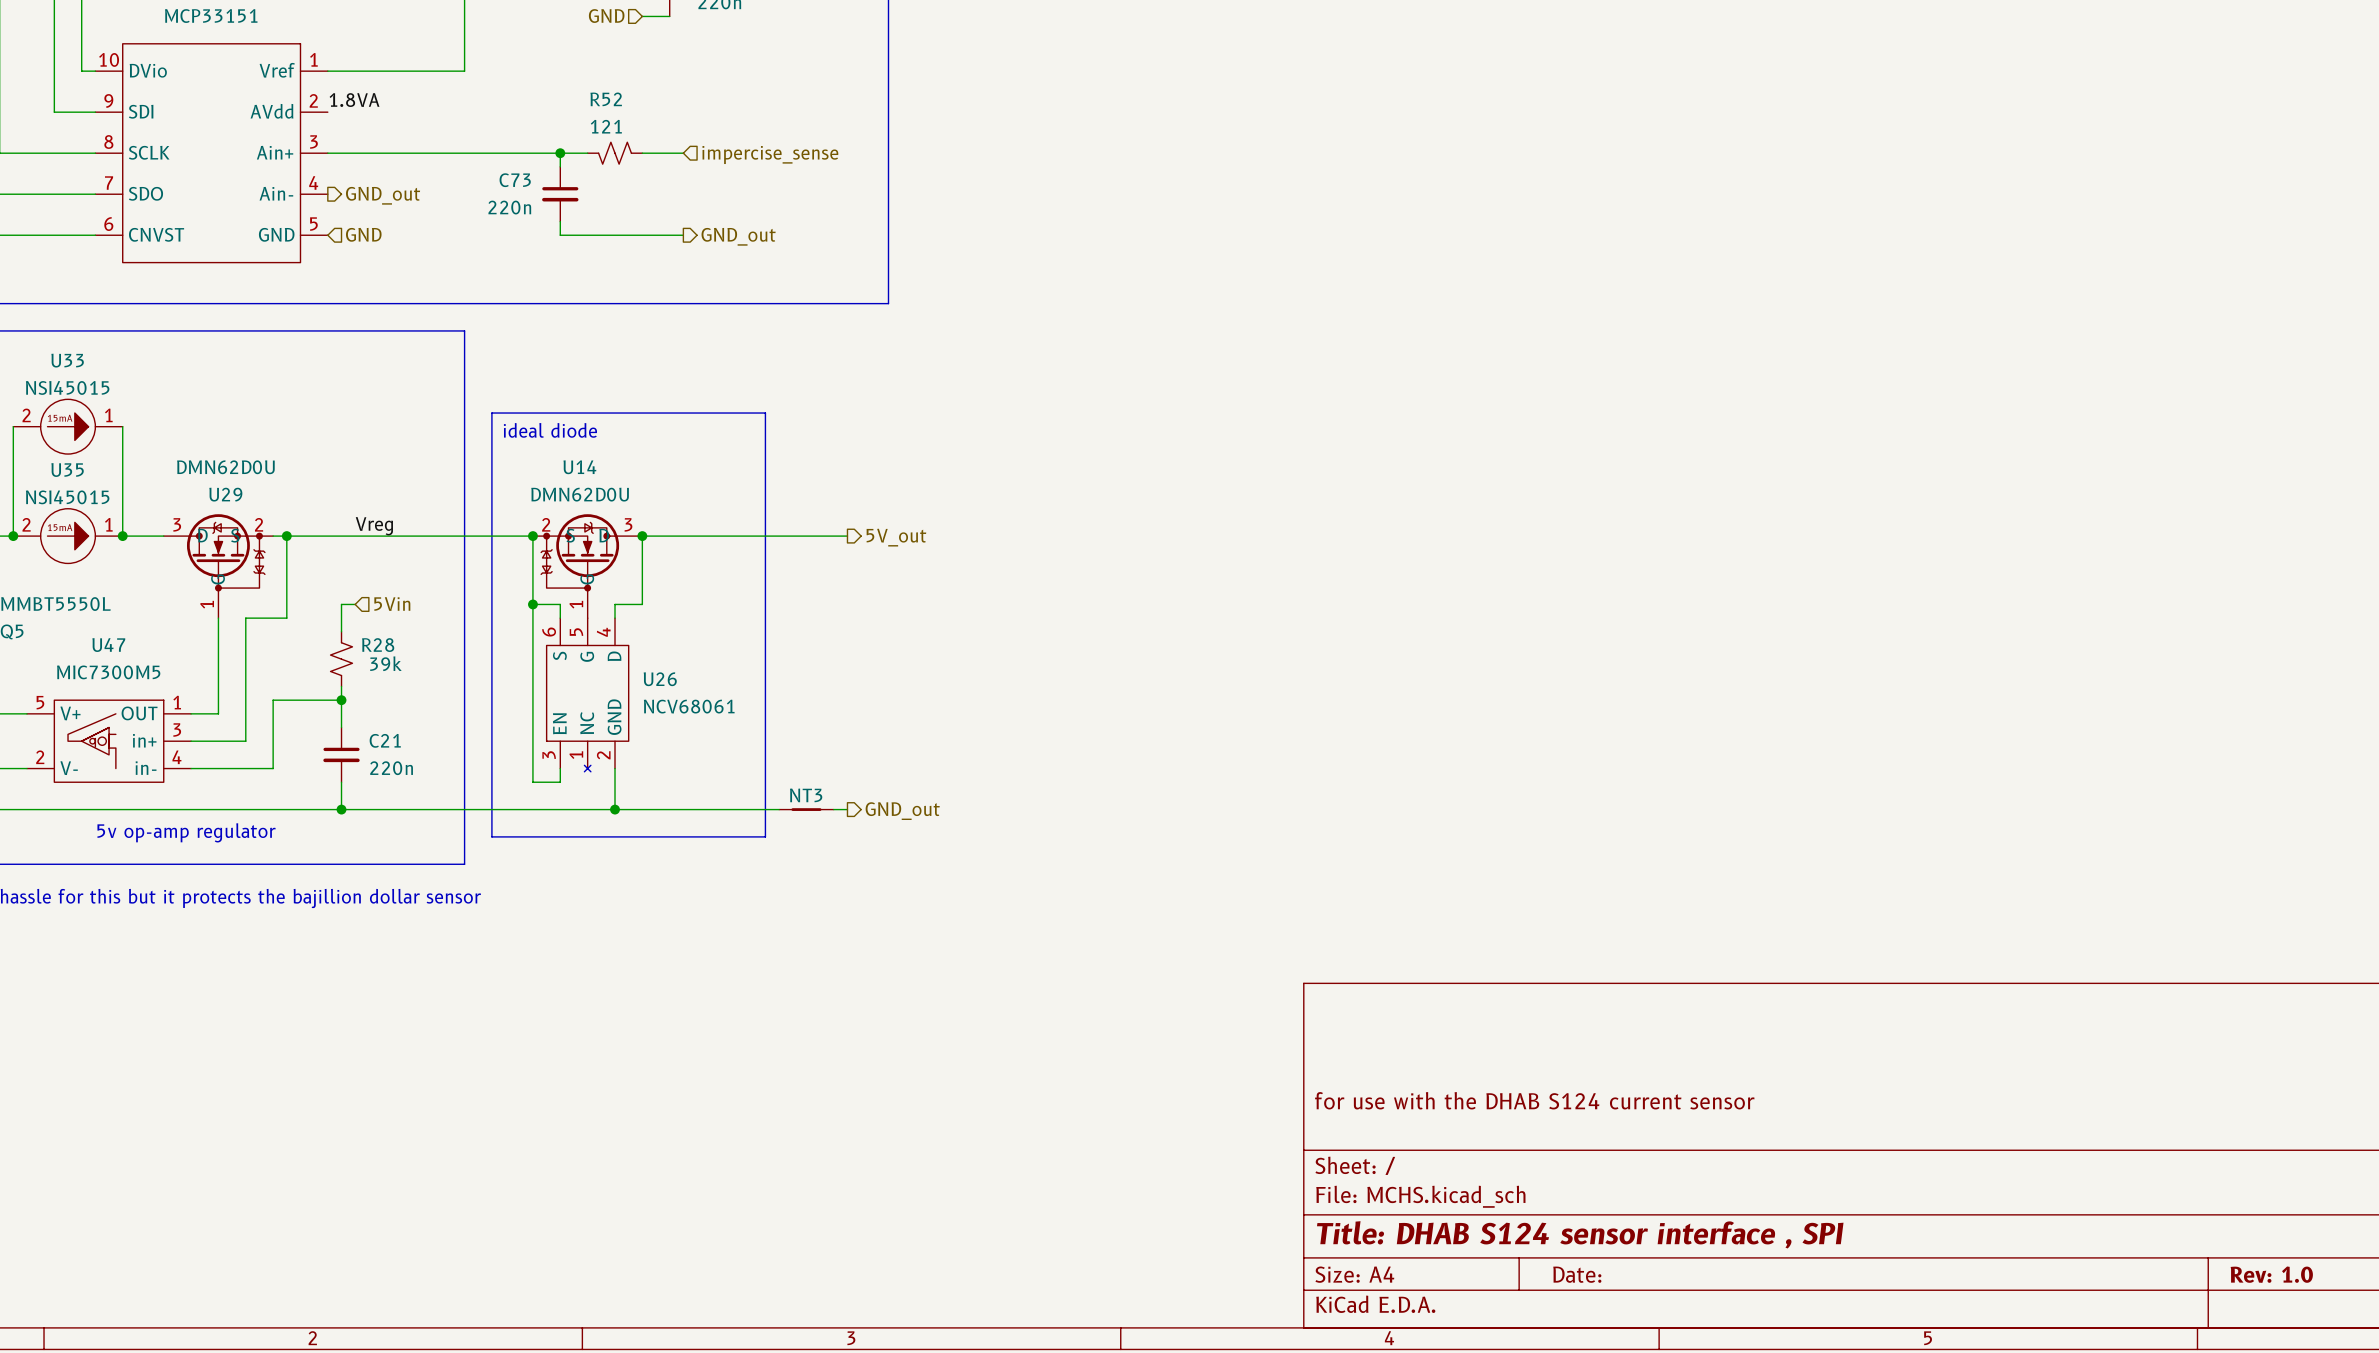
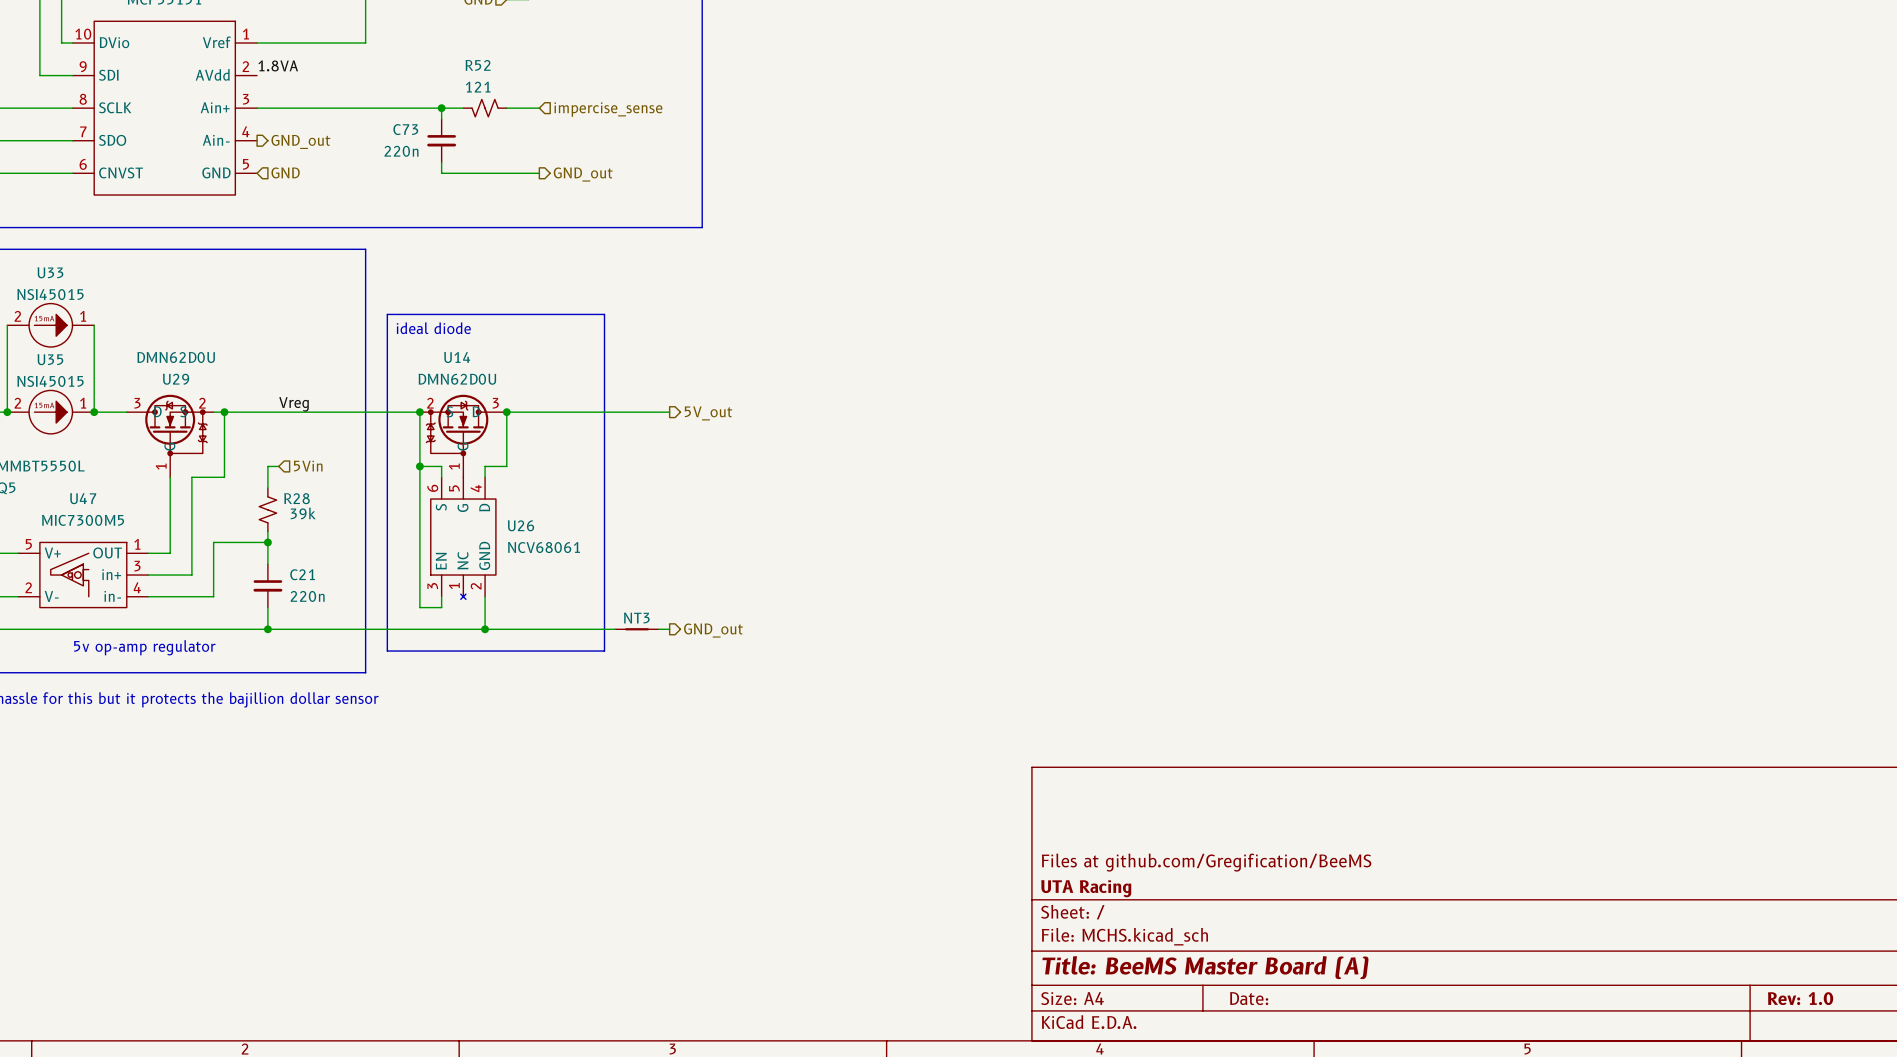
title block: for use with the DHAB S124 current sensor (1534, 1100) -> Files at github.com/Gregification/BeeMS (1206, 862)
title block: none -> UTA Racing (1086, 888)
title block: Title: DHAB S124 sensor interface , SPI (1580, 1234) -> Title: BeeMS Master Board (A) (1205, 967)

